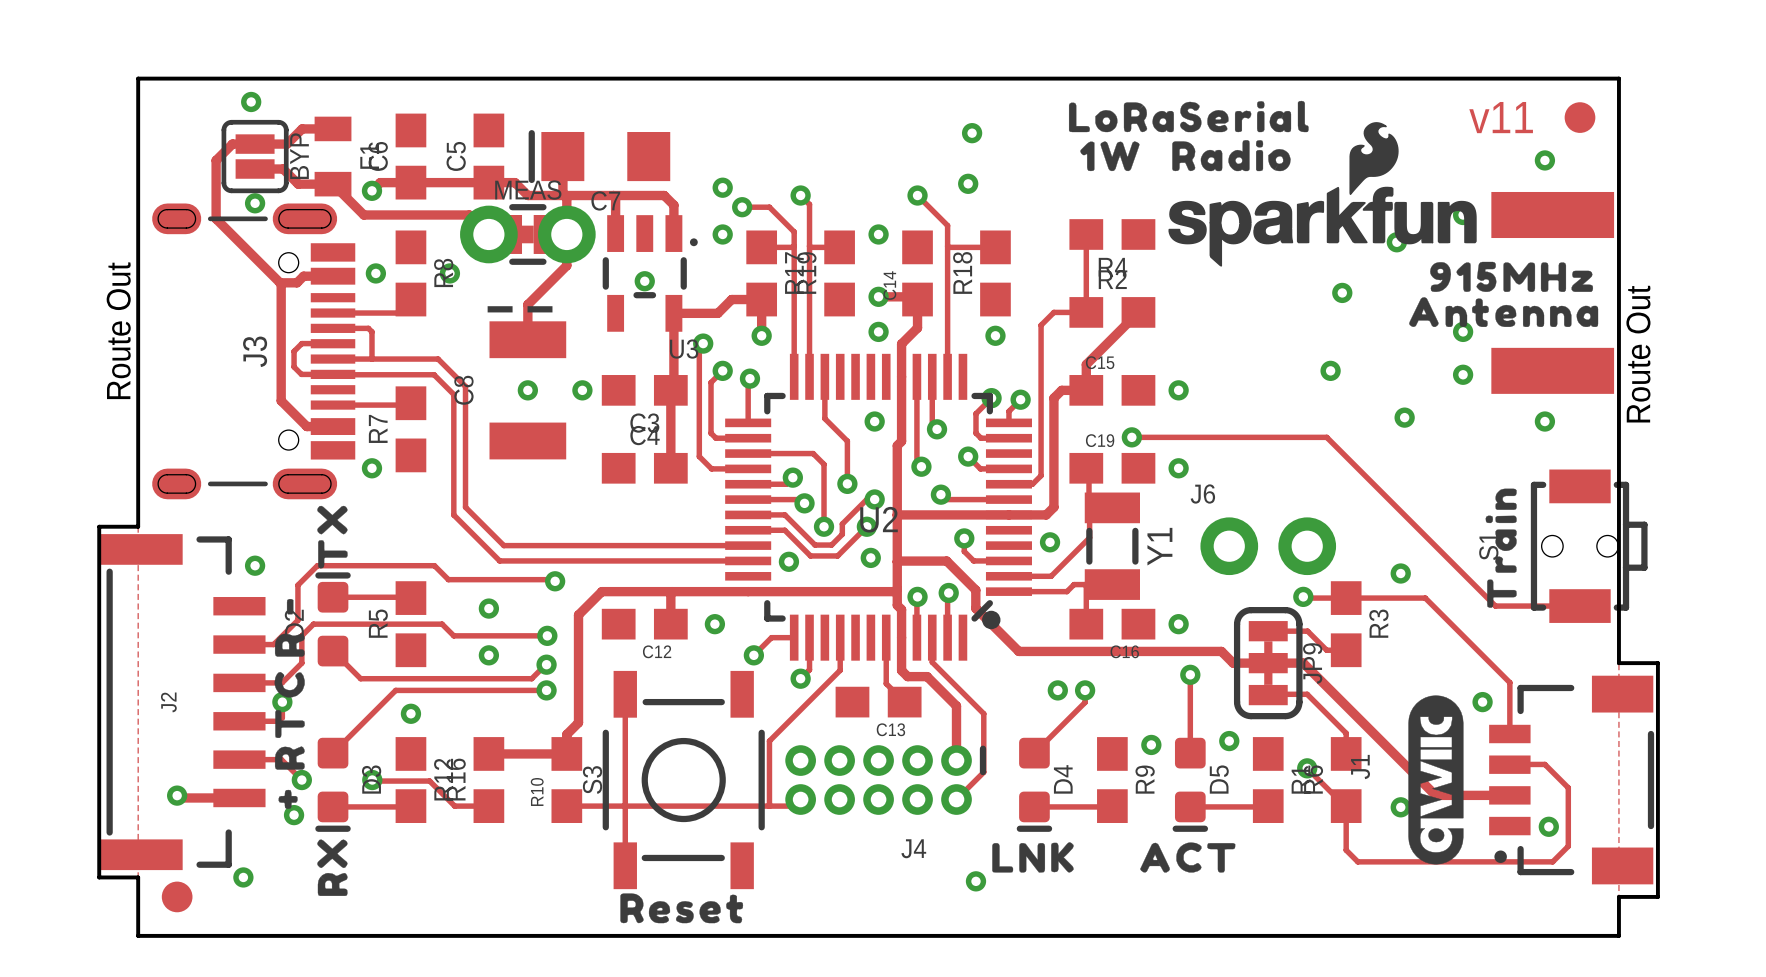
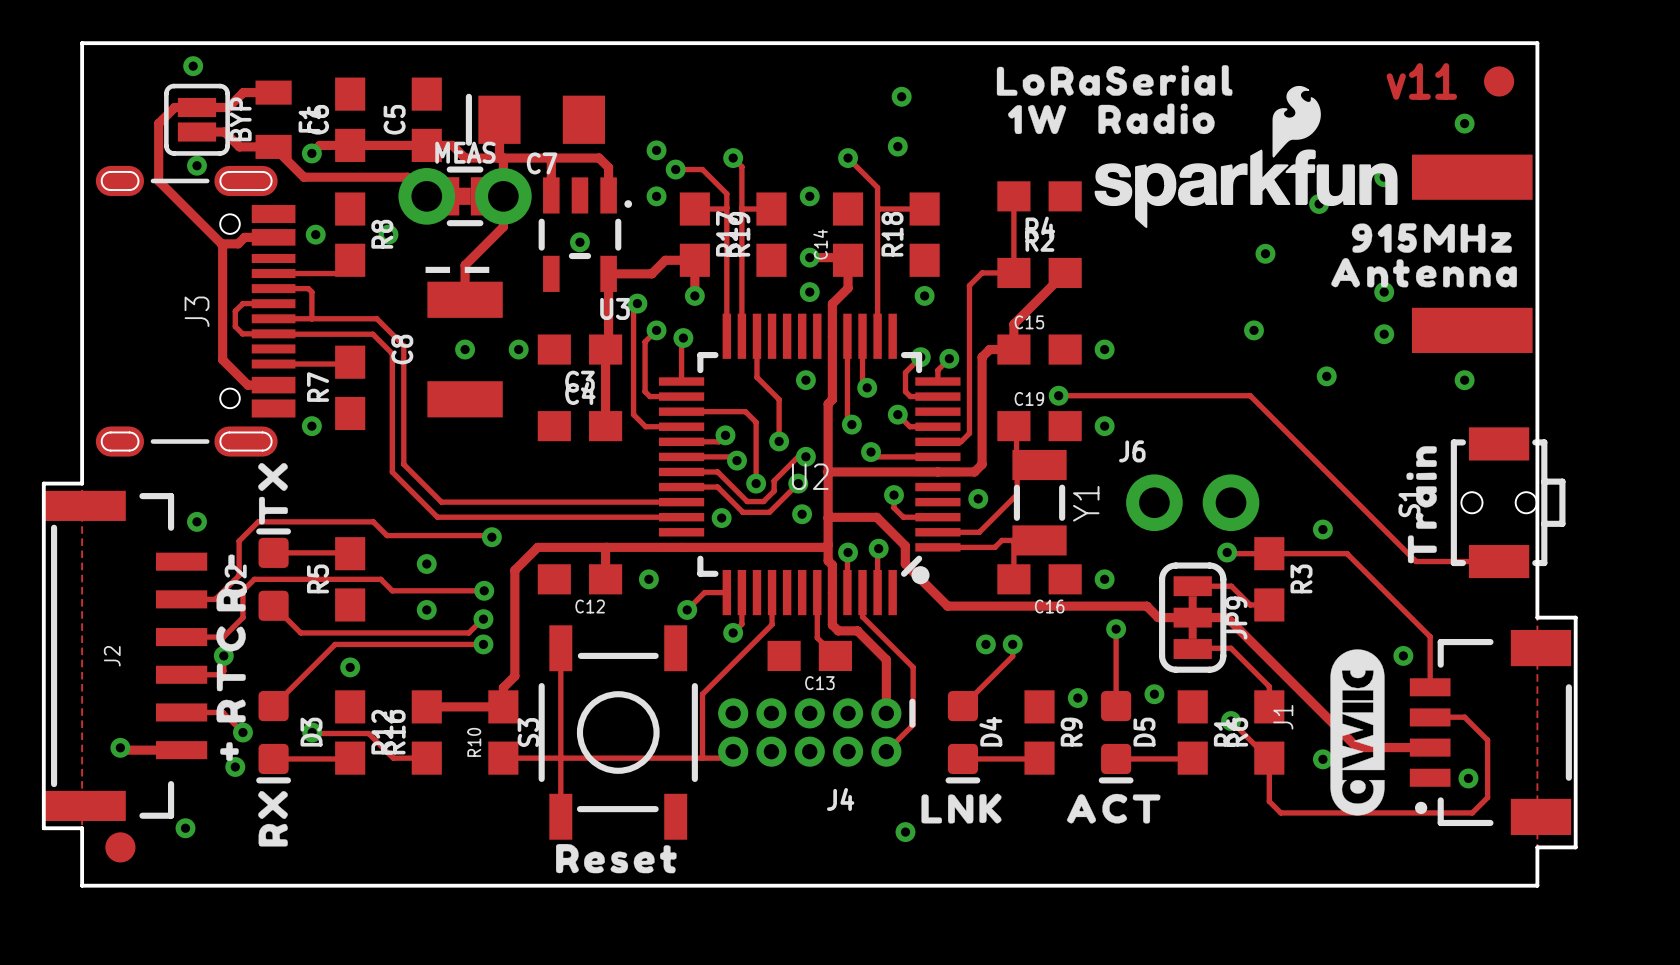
text: Route Out (118, 330) -> none
text: Route Out (1638, 354) -> none

